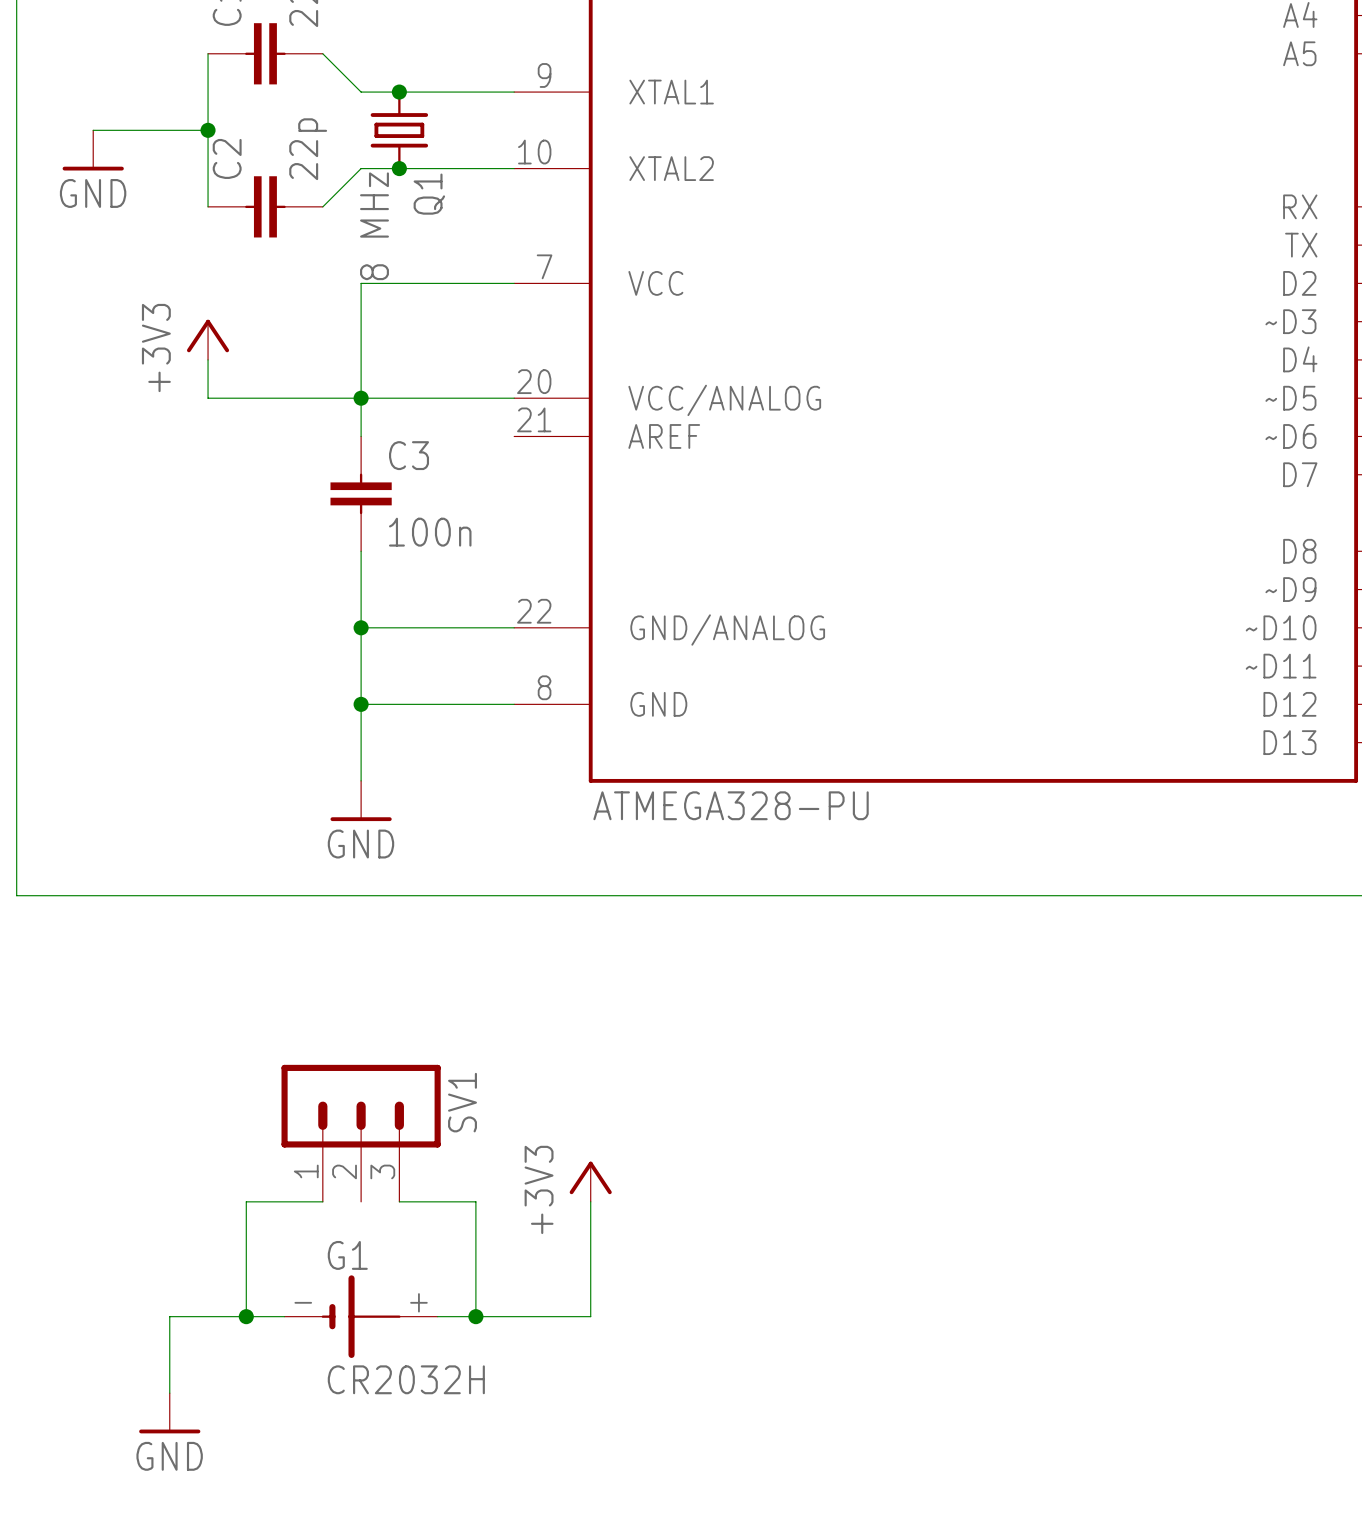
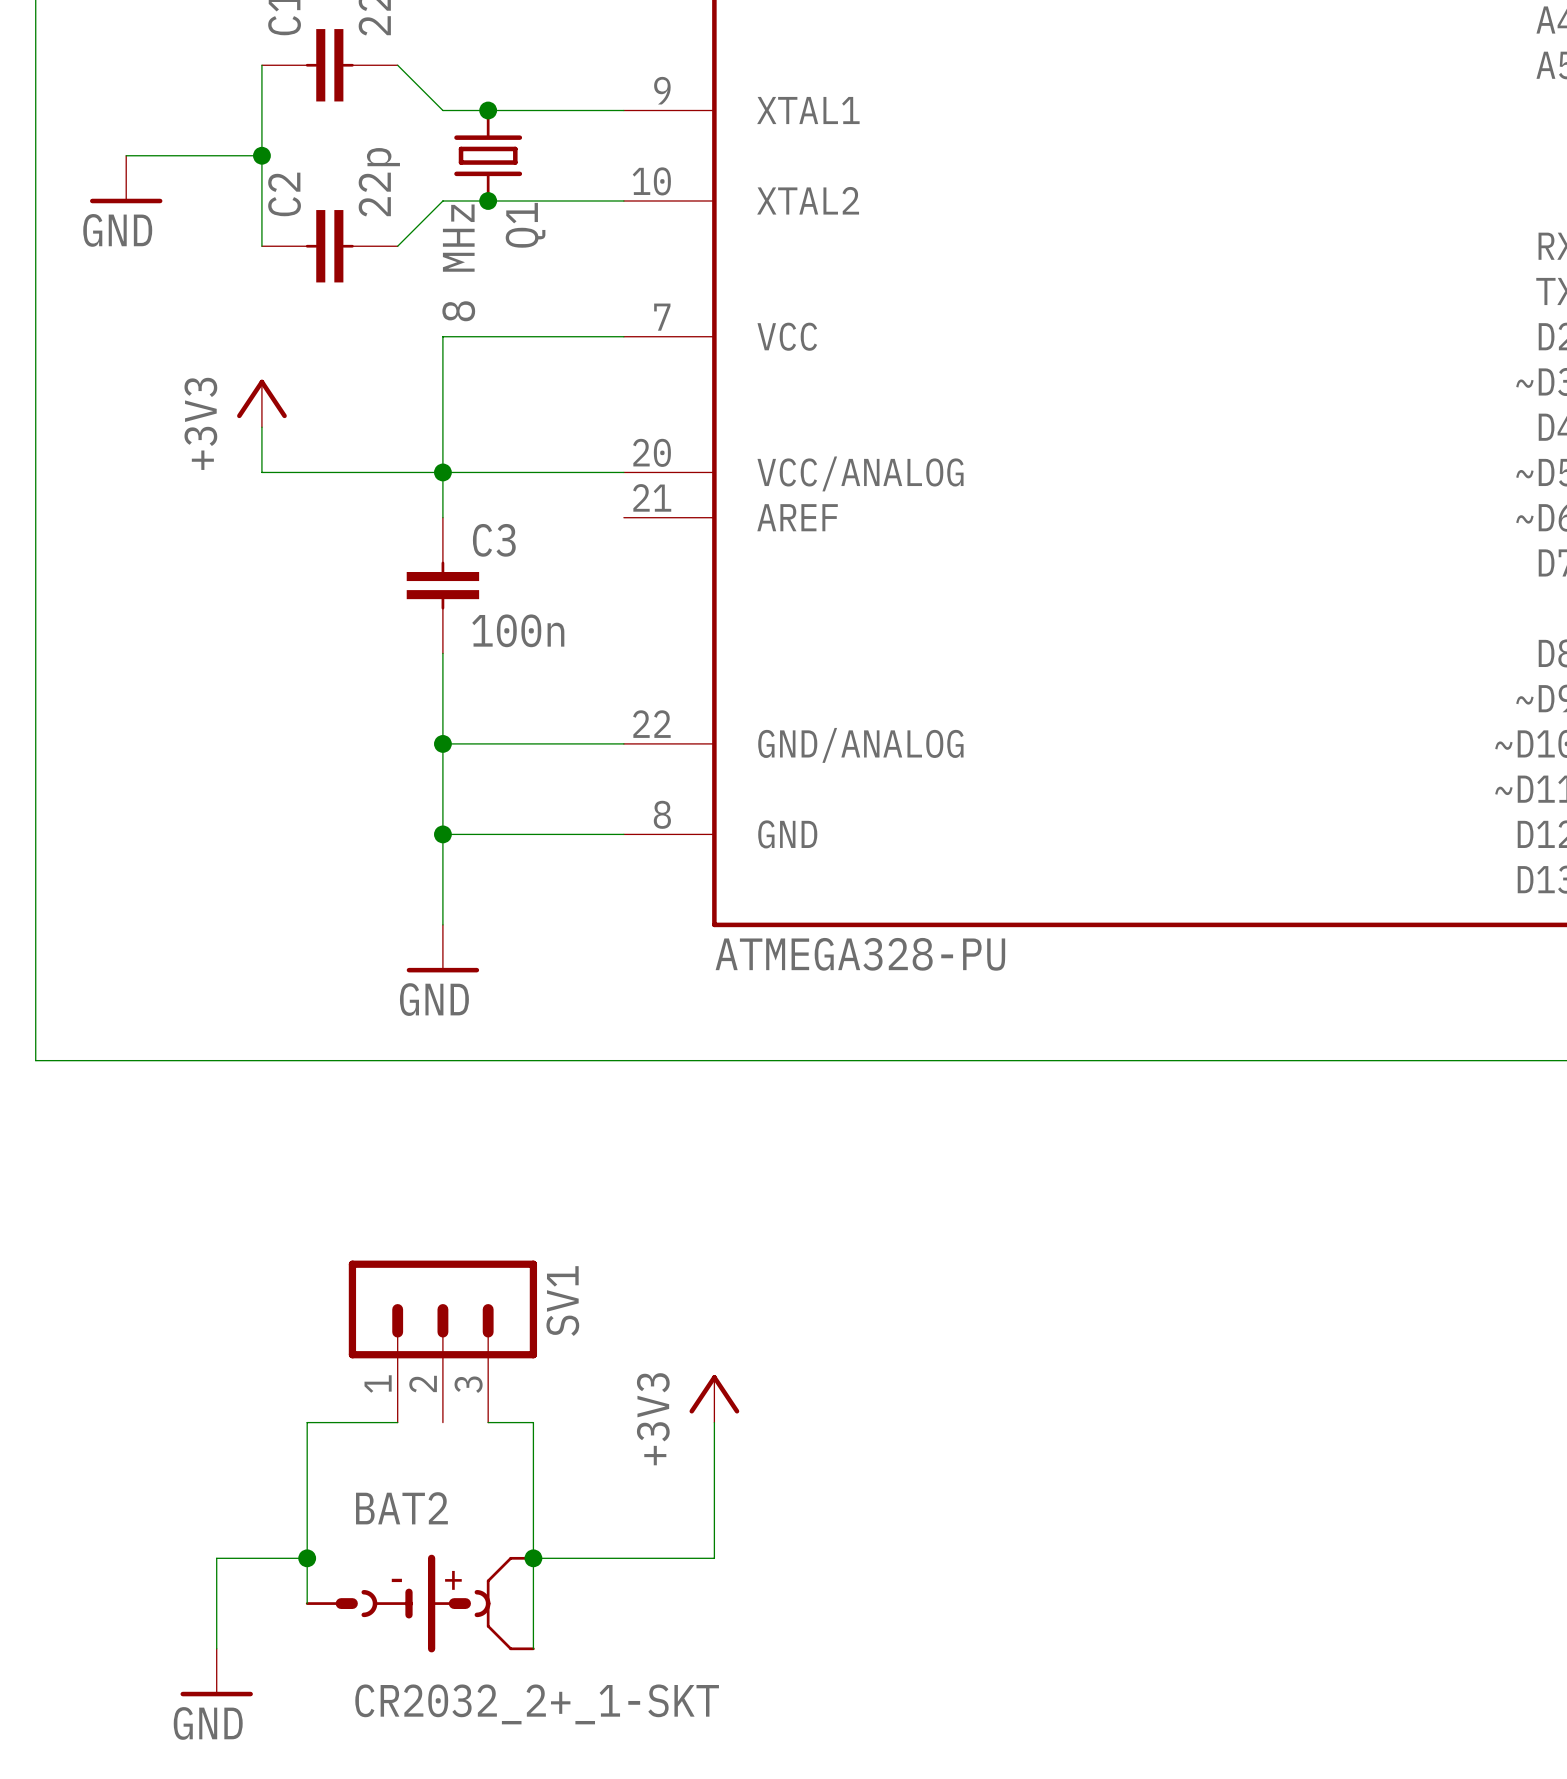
wire: (437, 1201) (475, 1201) (475, 1316) -> (533, 1422) (533, 1648)
wire: (246, 1316) (284, 1316) -> (307, 1558) (307, 1603)
G1: CR2032H (361, 1316) -> none
junction position: (475, 1316) -> (533, 1558)
BAT2: none -> CR2032_2+_1-SKT (420, 1603)

